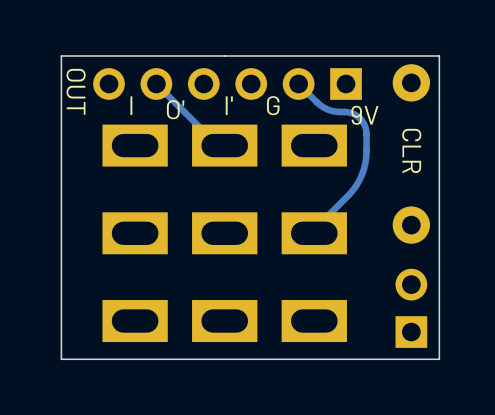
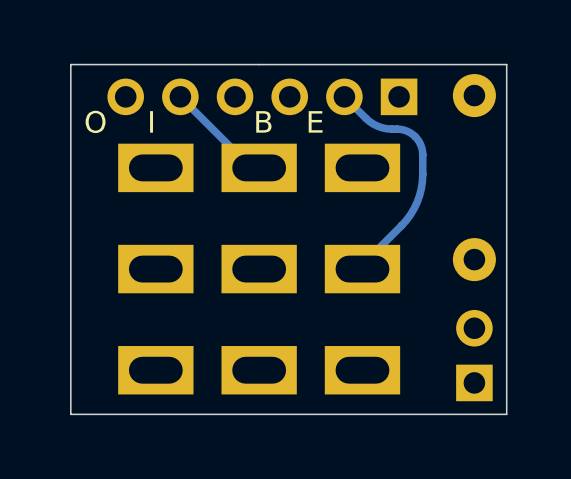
text: OUT (76, 91) -> O (95, 121)
text: I' (229, 105) -> B (263, 121)
text: G (273, 105) -> E (315, 121)
text: O' (175, 109) -> none
text: 9V (364, 115) -> none
text: CLR (411, 151) -> none

